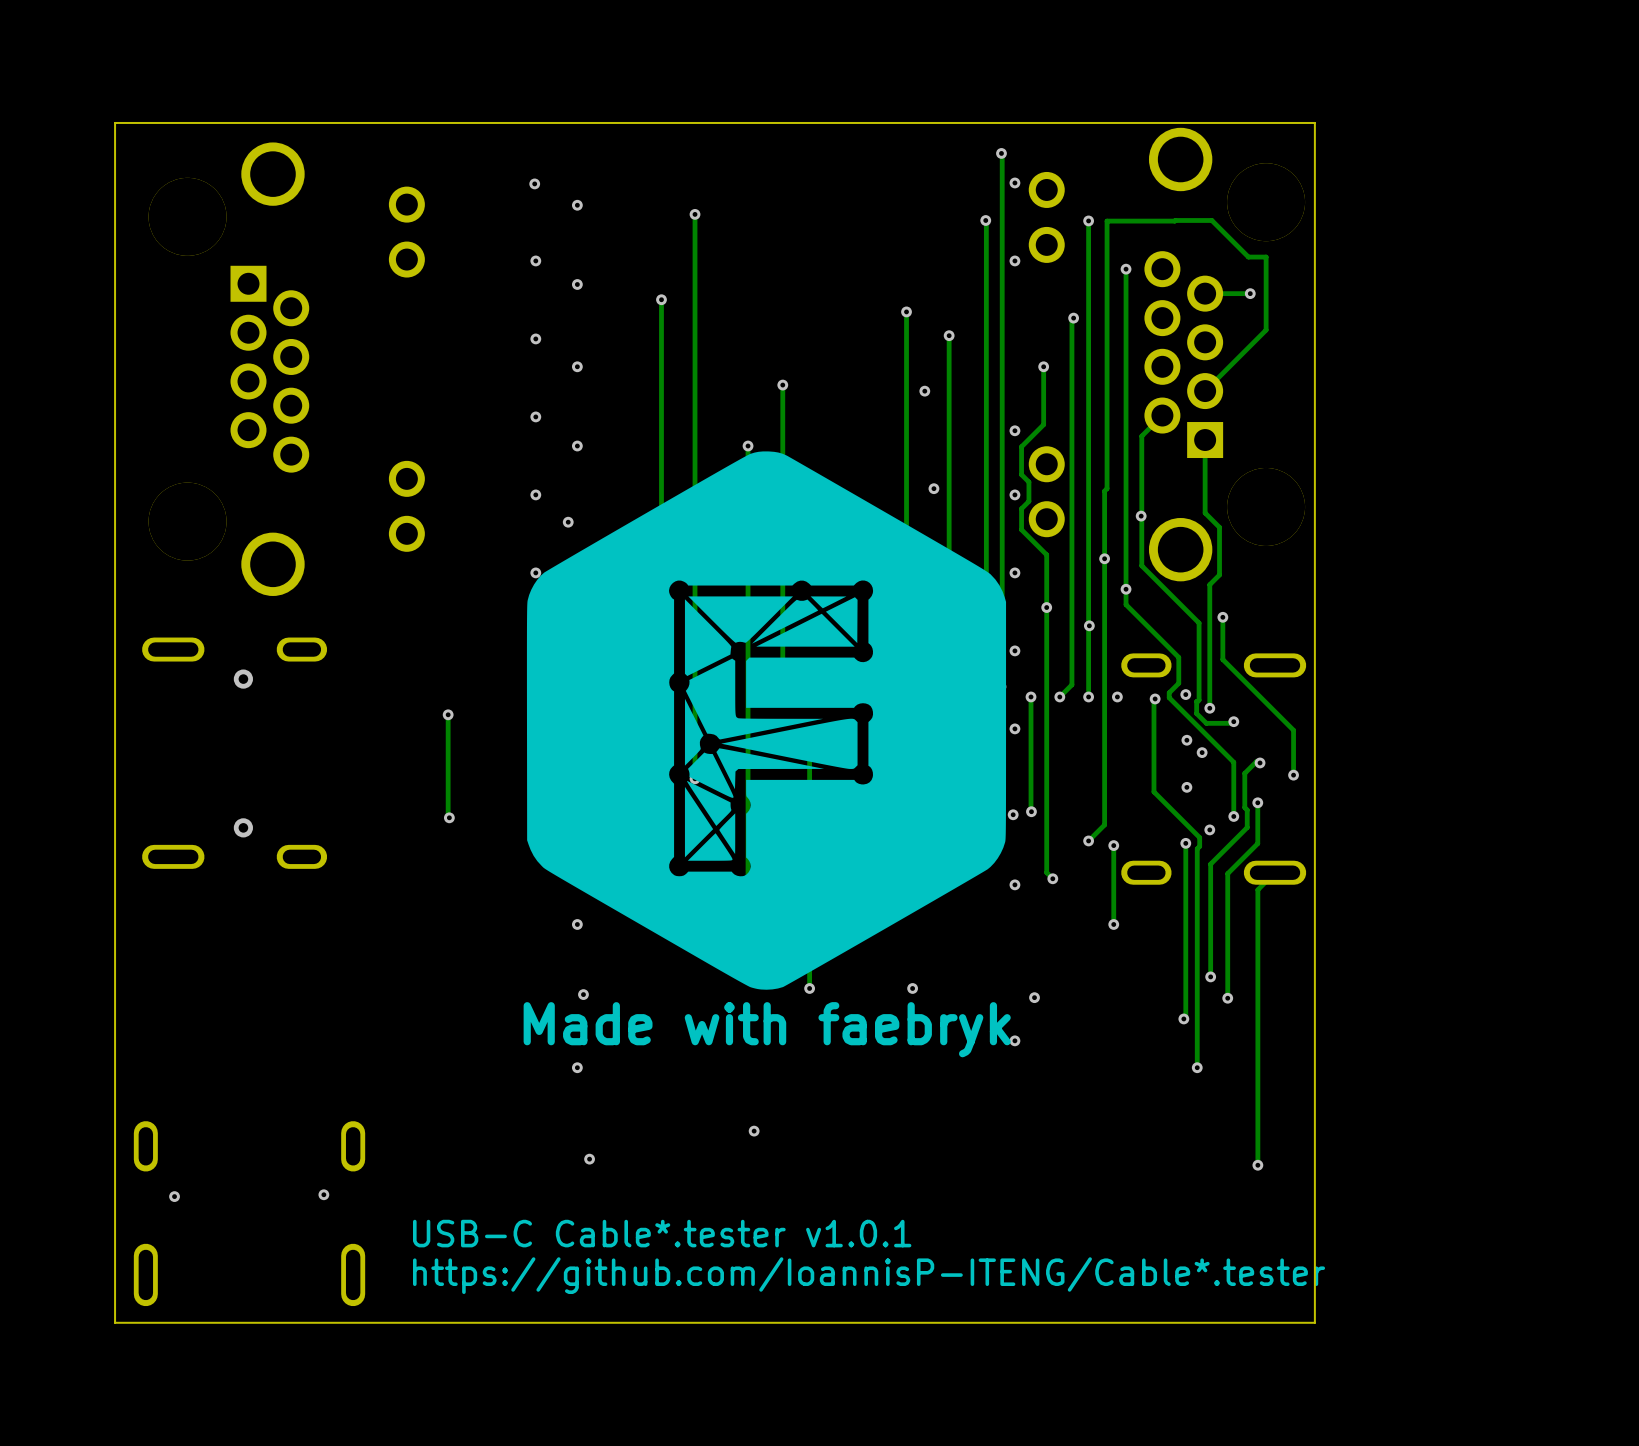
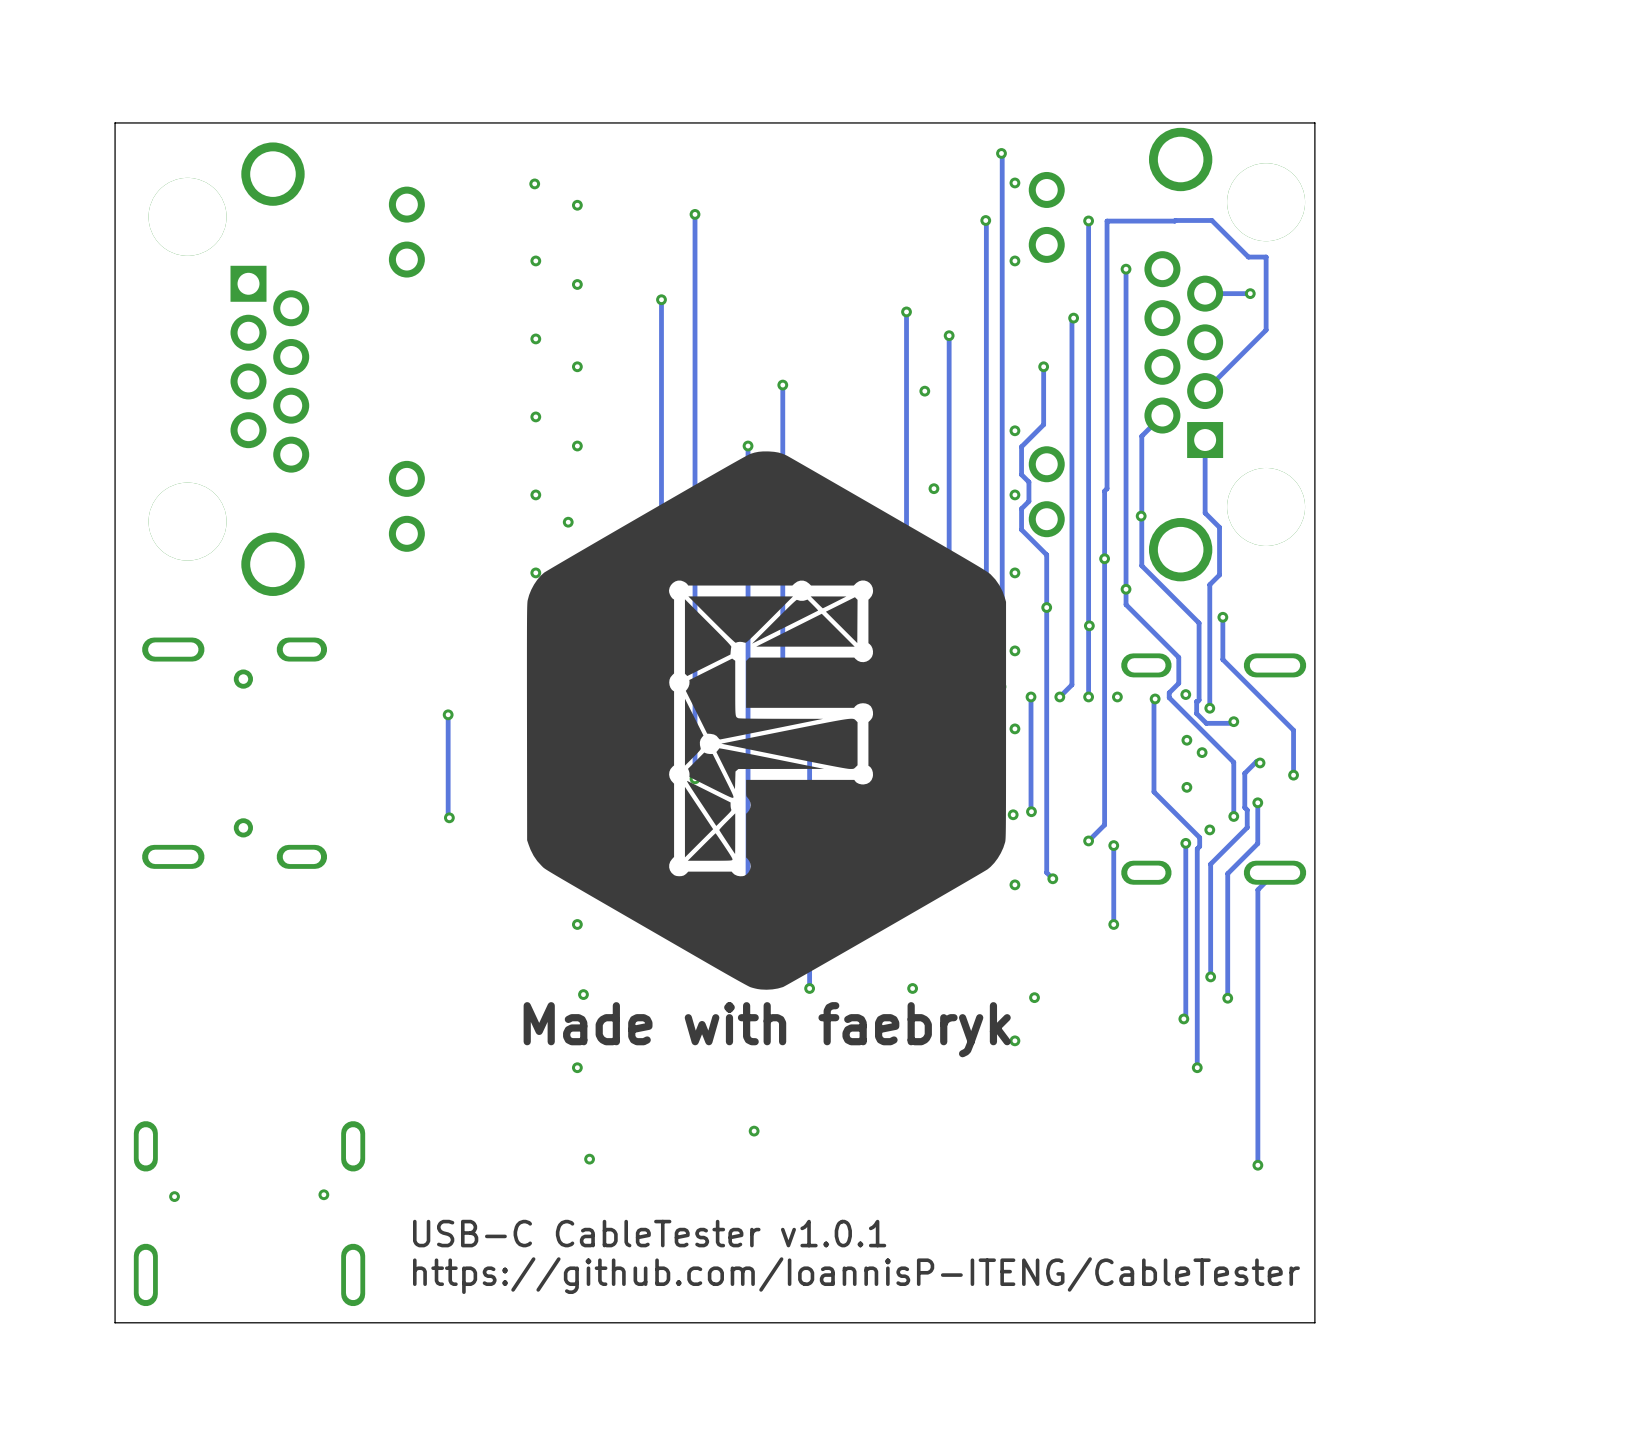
text: USB-C Cable*.tester v1.0.1 (662, 1233) -> USB-C CableTester v1.0.1 (649, 1233)
text: https://github.com/IoannisP-ITENG/Cable*.tester (869, 1275) -> https://github.com/IoannisP-ITENG/CableTester (856, 1275)

